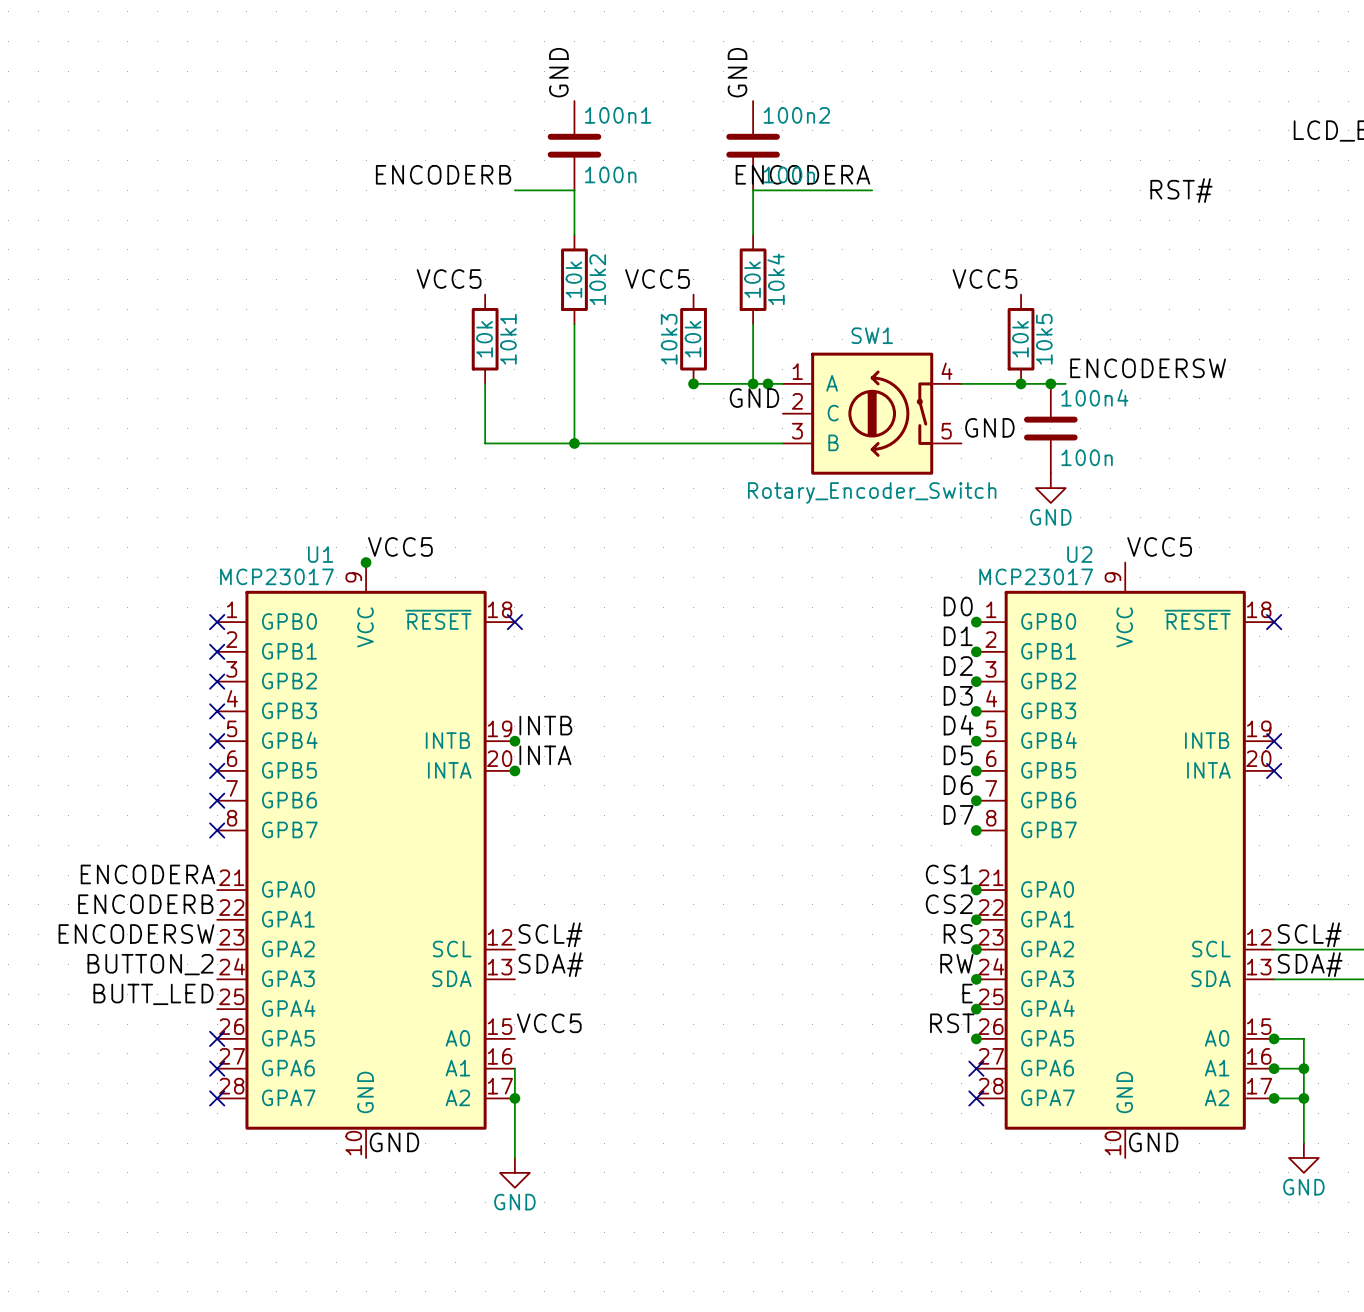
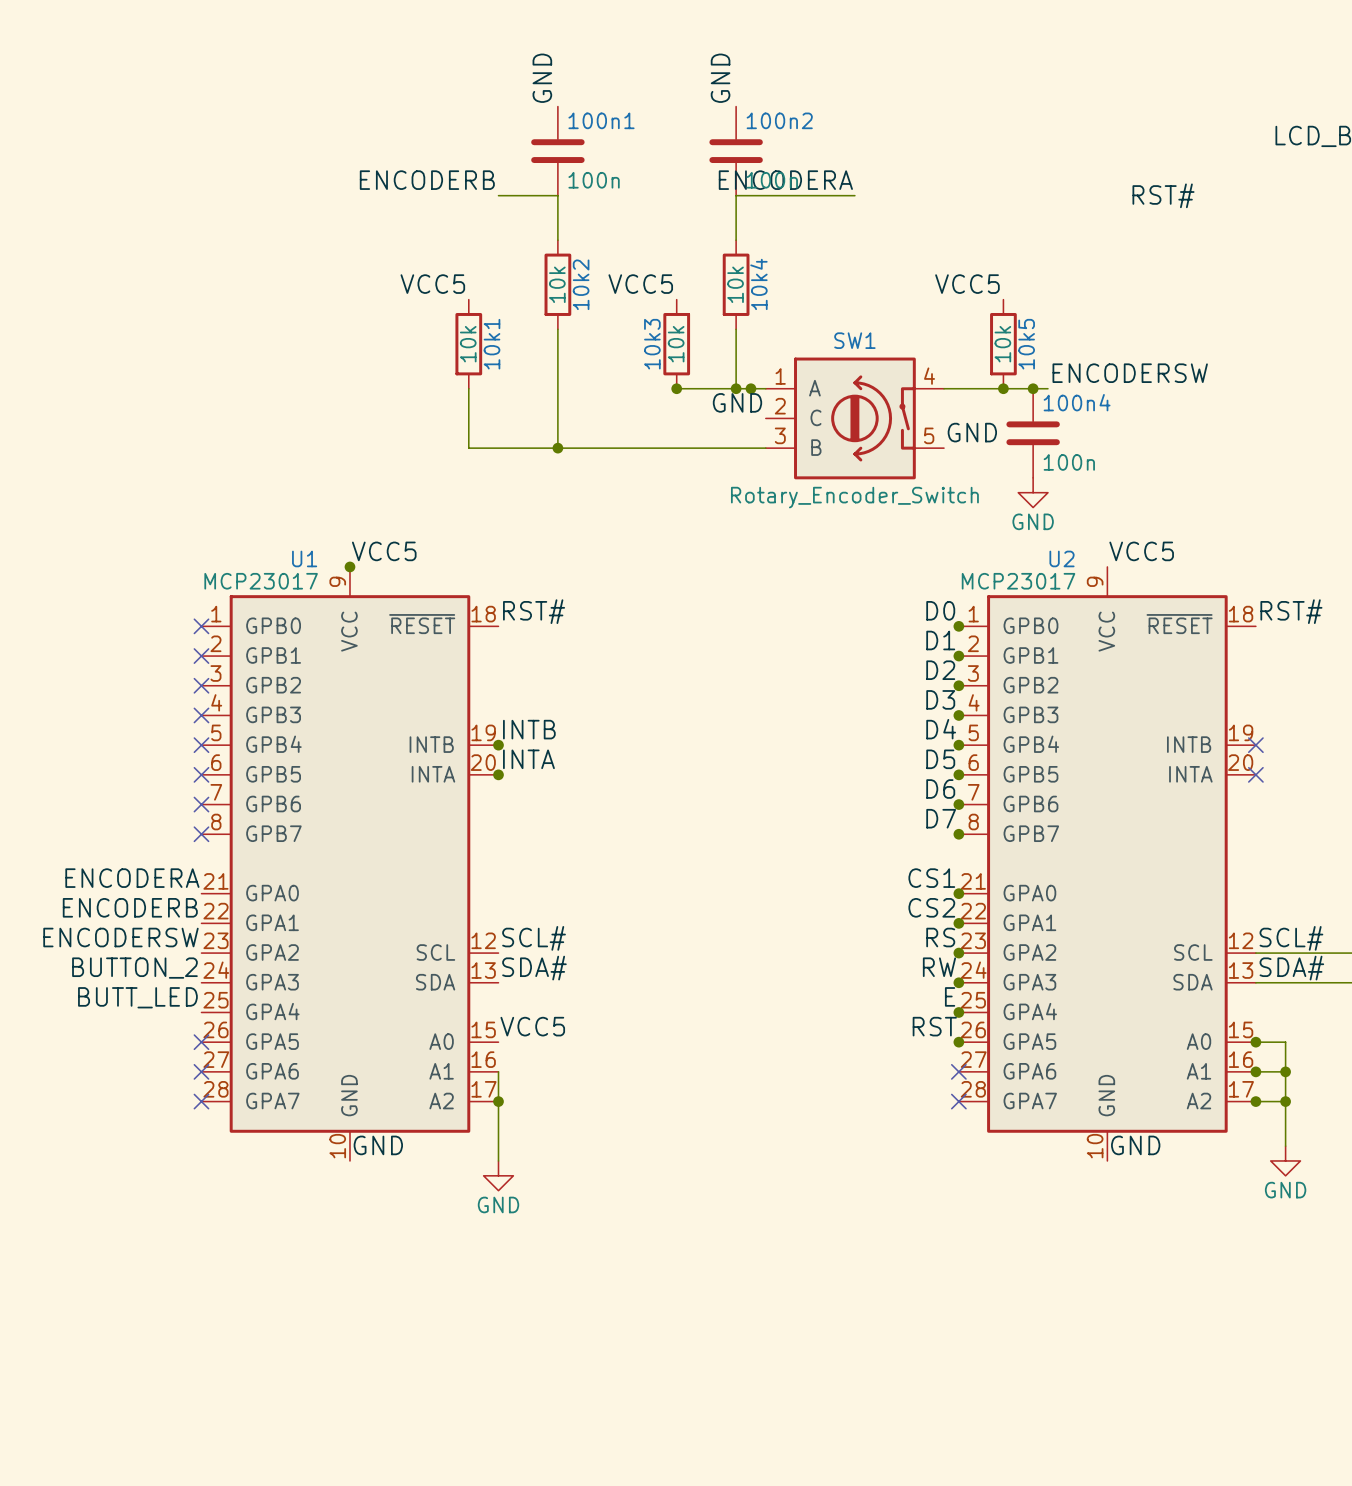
label: none -> RST# (534, 611)
label: none -> RST# (1291, 611)
no-connect mark: (514, 622) -> none
no-connect mark: (1274, 622) -> none

